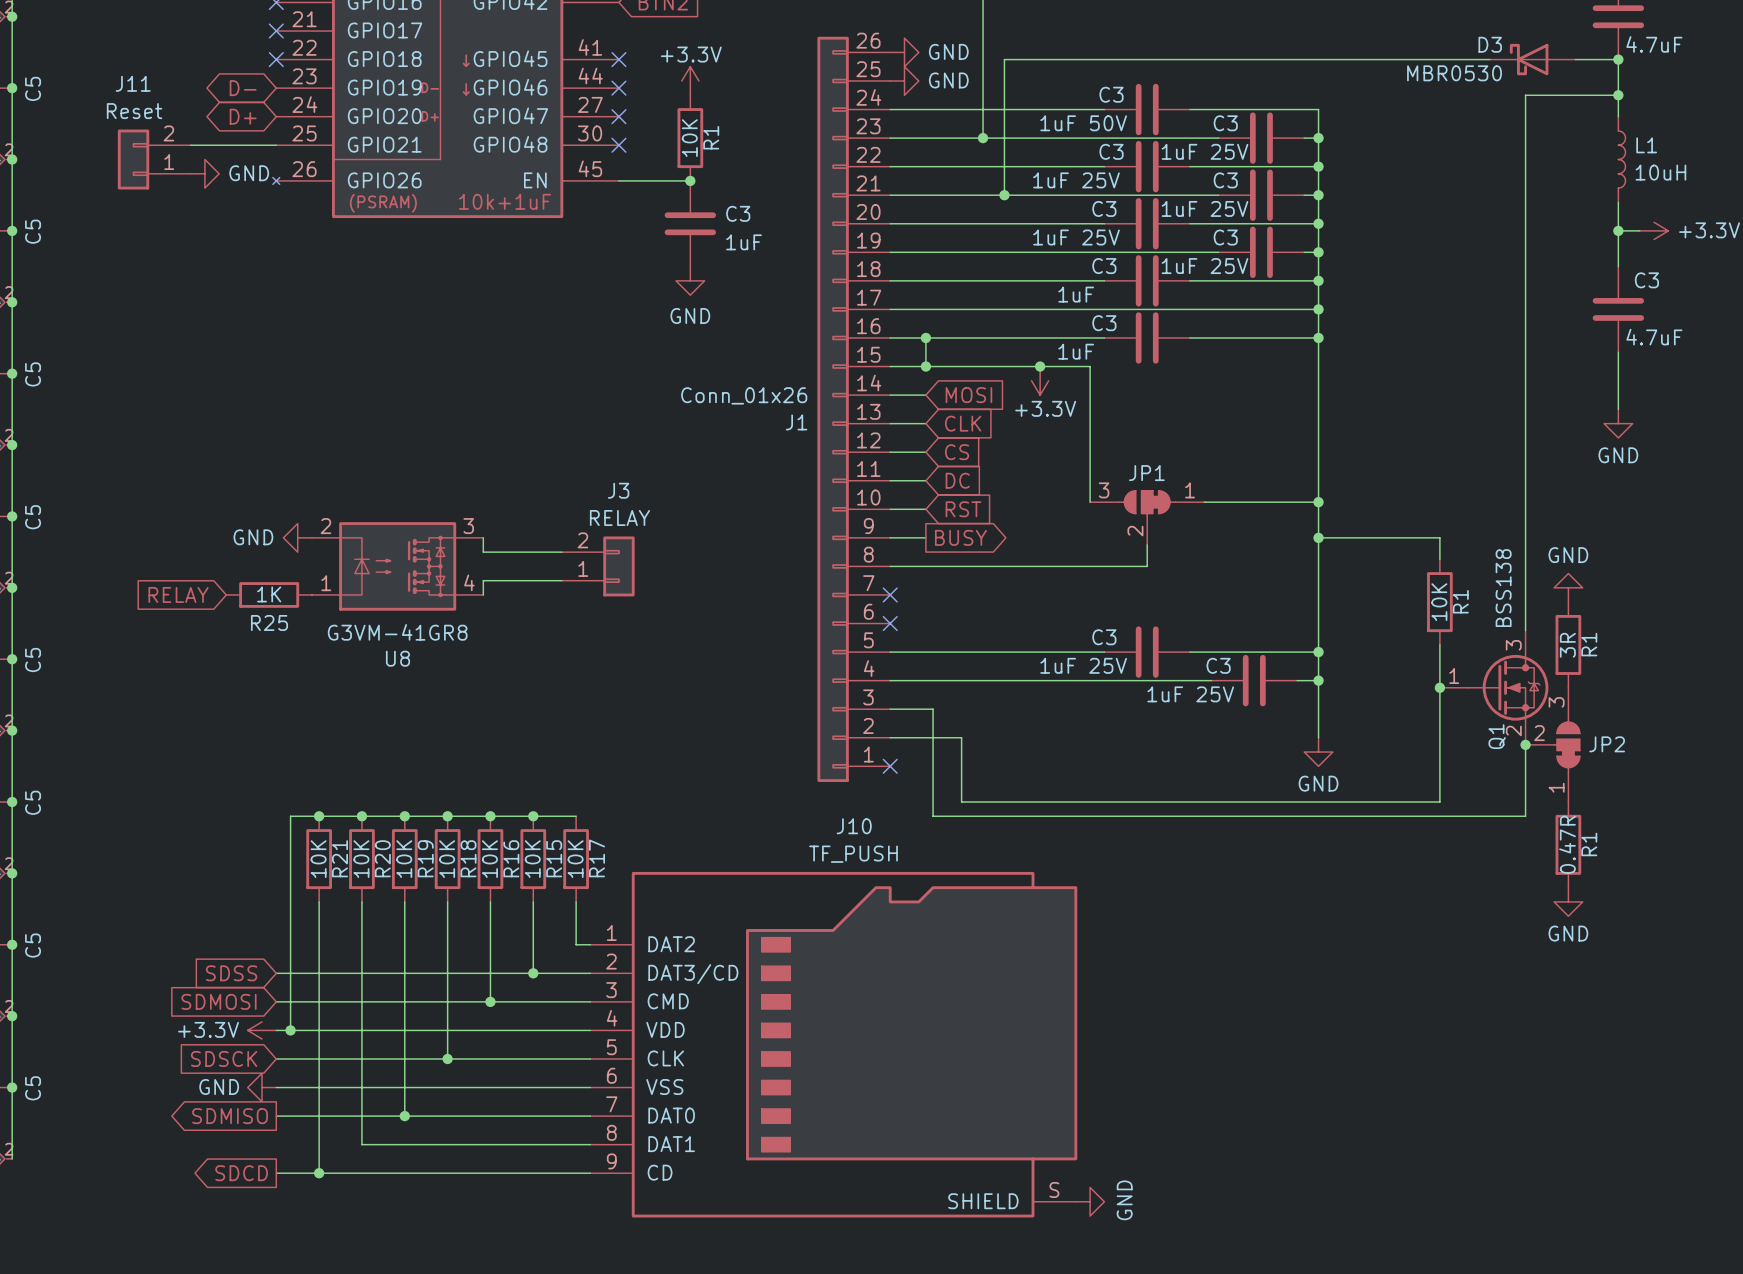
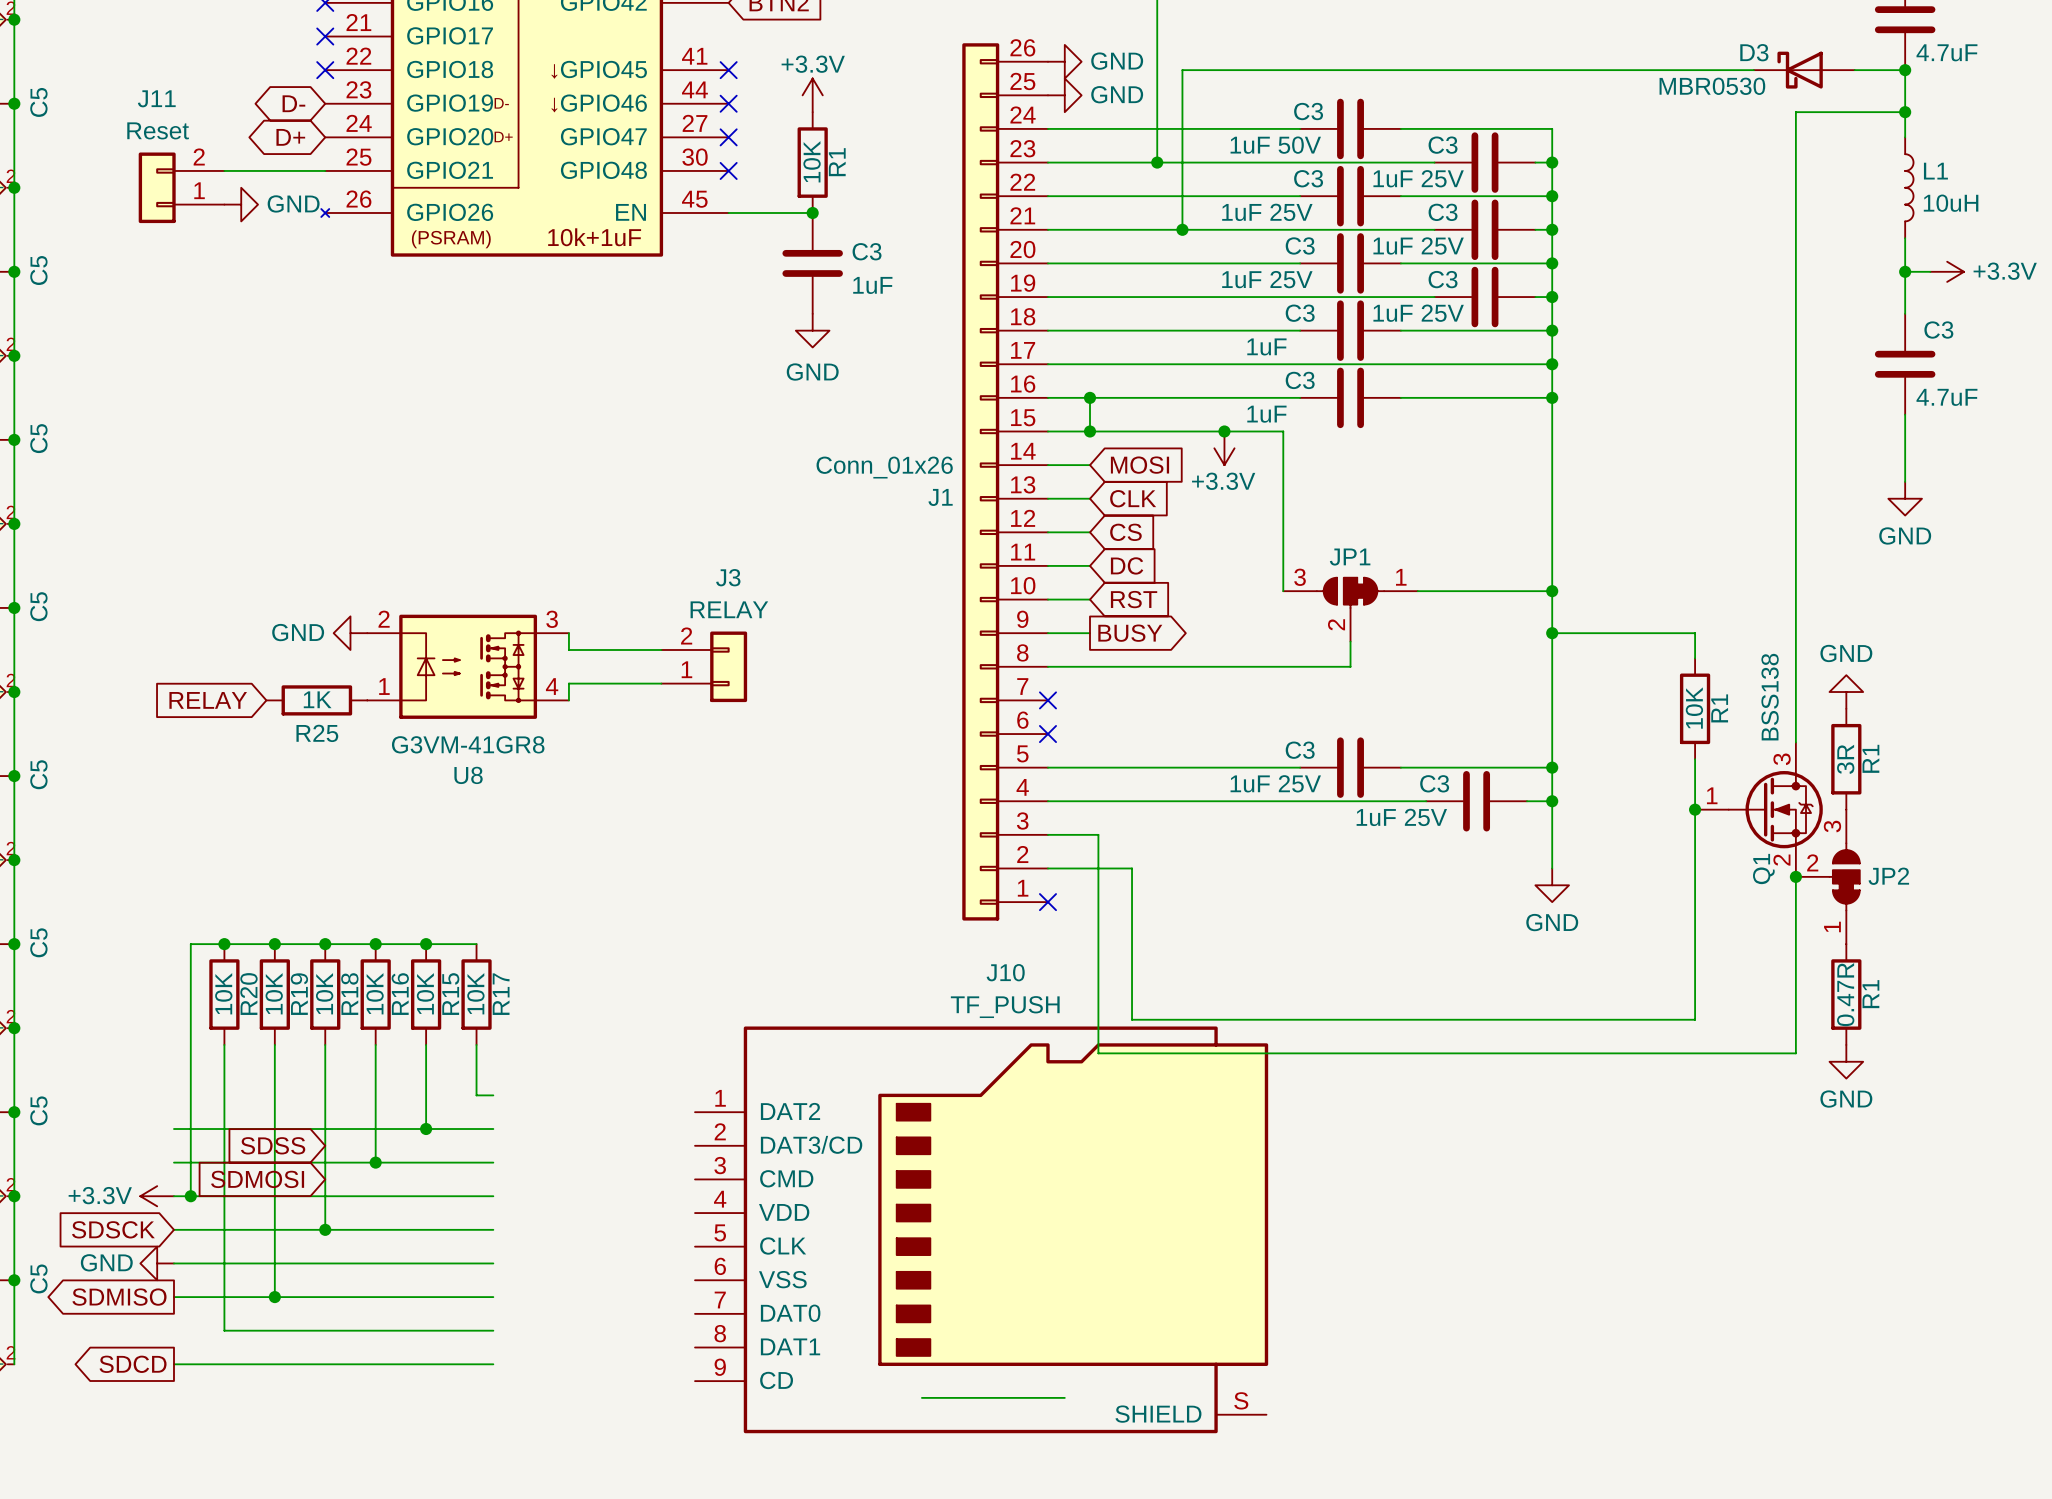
junction: none -> (224, 944)
junction: none -> (274, 944)
junction: none -> (325, 944)
wire: none -> (476, 944) (190, 944) (190, 1196)
wire: (961, 801) (1439, 801) -> (1132, 944) (1132, 1019) (1695, 1019) (1695, 944)
junction position: (319, 816) -> (375, 944)
junction position: (361, 816) -> (426, 944)
junction: (404, 816) -> none
junction: (447, 816) -> none
junction: (490, 816) -> none
junction: (533, 816) -> none
wire: (576, 816) (290, 816) (290, 1030) -> none
wire: (933, 816) (1525, 816) -> (1098, 960) (1098, 1053) (1795, 1053) (1795, 960)
R21: 10K (319, 859) -> none
R20 position: (361, 859) -> (224, 994)
R19 position: (404, 859) -> (274, 994)
R18 position: (447, 859) -> (325, 994)
R16 position: (490, 859) -> (375, 994)
R15 position: (533, 859) -> (426, 994)
R17 position: (576, 859) -> (476, 994)
wire: none -> (224, 1044) (224, 1330) (493, 1330)
wire: none -> (274, 1044) (274, 1297)
wire: (447, 901) (447, 1058) -> (325, 1044) (325, 1229)
wire: (490, 901) (490, 1001) -> none
wire: (533, 901) (533, 973) -> none
wire: (576, 901) (576, 944) (590, 944) -> none
wire: (404, 930) (404, 1116) -> (476, 1095) (493, 1095)
wire: none -> (173, 1129) (493, 1129)
wire: (361, 959) (361, 1144) (590, 1144) -> none
junction: none -> (426, 1129)
wire: (276, 973) (590, 973) -> none
junction: (533, 973) -> none
wire: none -> (173, 1162) (493, 1162)
wire: (319, 987) (319, 1173) -> none
junction: none -> (375, 1162)
wire: (276, 1001) (590, 1001) -> none
junction: (490, 1001) -> none
wire: none -> (173, 1196) (493, 1196)
junction: none -> (190, 1196)
power symbol position: +3.3V (262, 1030) -> +3.3V (157, 1196)
wire: (276, 1030) (590, 1030) -> none
junction position: (290, 1030) -> (325, 1229)
wire: none -> (173, 1229) (493, 1229)
global label position: SDSCK (224, 1058) -> SDSCK (113, 1229)
wire: (276, 1058) (590, 1058) -> none
junction: (447, 1058) -> none
wire: none -> (173, 1263) (493, 1263)
power symbol position: GND (262, 1087) -> GND (157, 1263)
wire: (276, 1087) (590, 1087) -> none
wire: none -> (173, 1297) (493, 1297)
junction: none -> (274, 1297)
global label position: SDMISO (230, 1116) -> SDMISO (119, 1297)
wire: (276, 1116) (590, 1116) -> none
junction: (404, 1116) -> none
wire: none -> (173, 1364) (493, 1364)
global label position: SDCD (241, 1173) -> SDCD (133, 1364)
wire: (276, 1173) (590, 1173) -> none
junction: (319, 1173) -> none
wire: none -> (921, 1397) (1064, 1397)
power symbol: GND (1090, 1201) -> none

